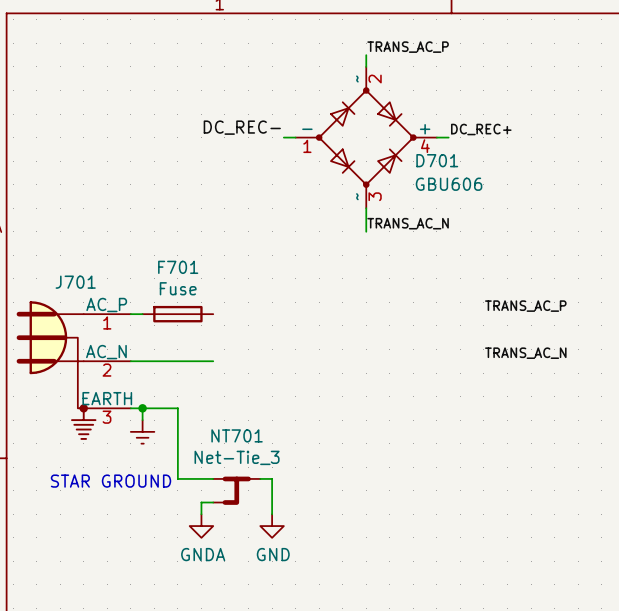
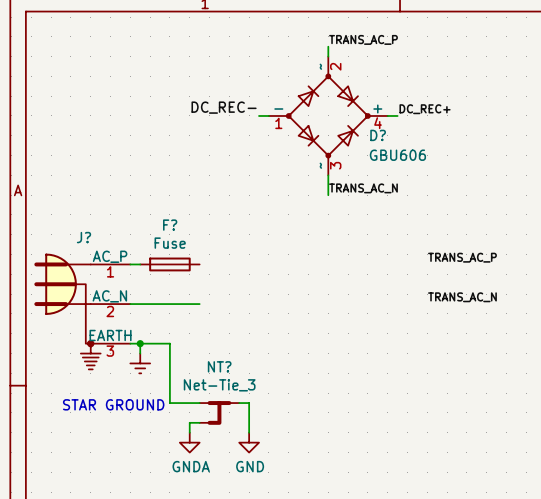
D701 name: D701 (437, 160) -> D? (378, 135)
F701 name: F701 (178, 267) -> F? (170, 225)
J701 name: J701 (75, 282) -> J? (83, 237)
NT701 name: NT701 (237, 435) -> NT? (219, 366)

